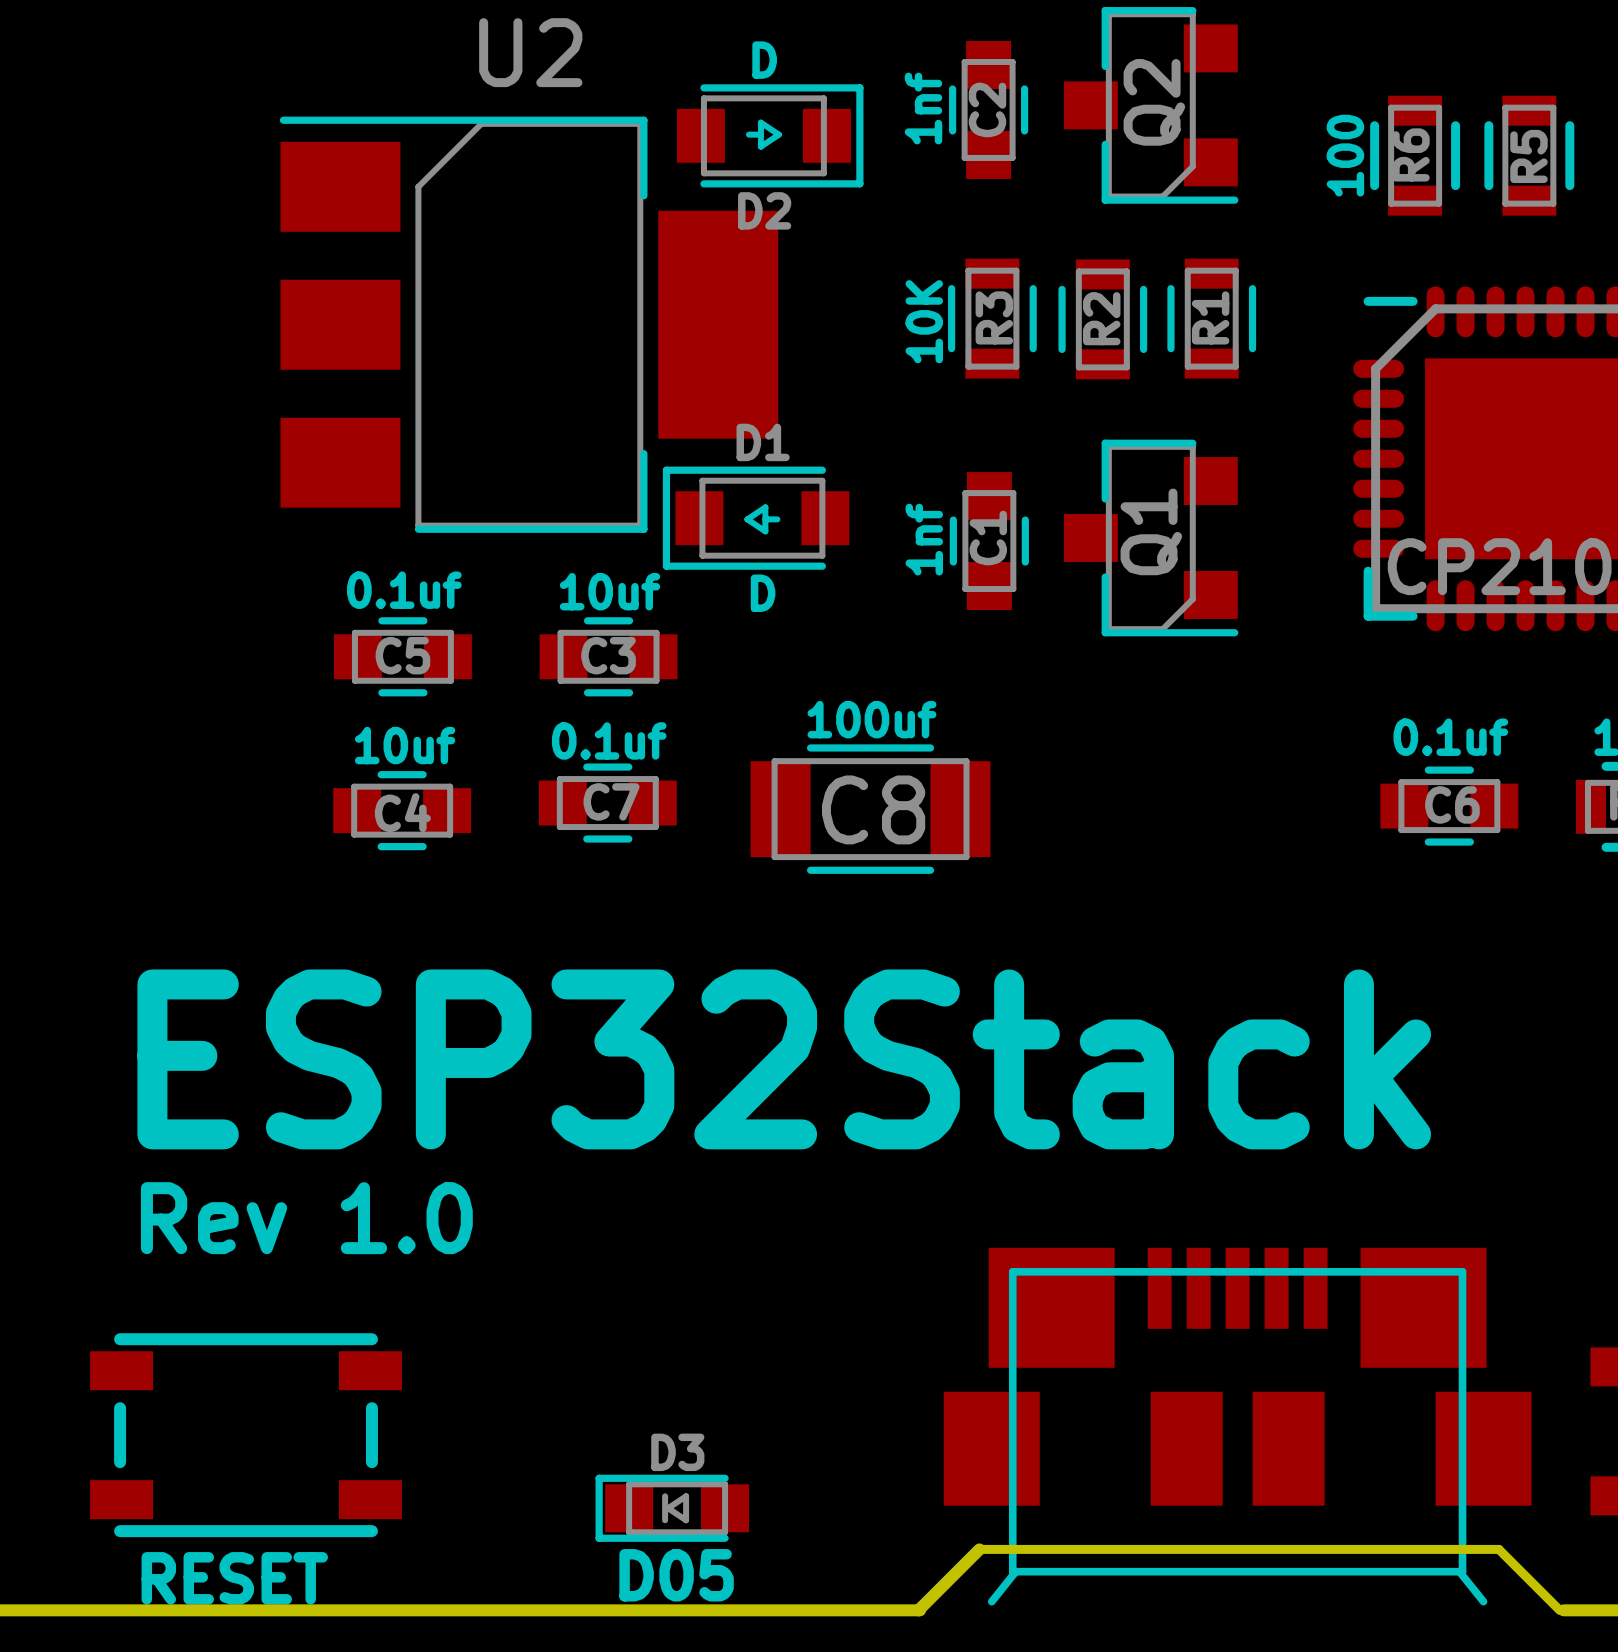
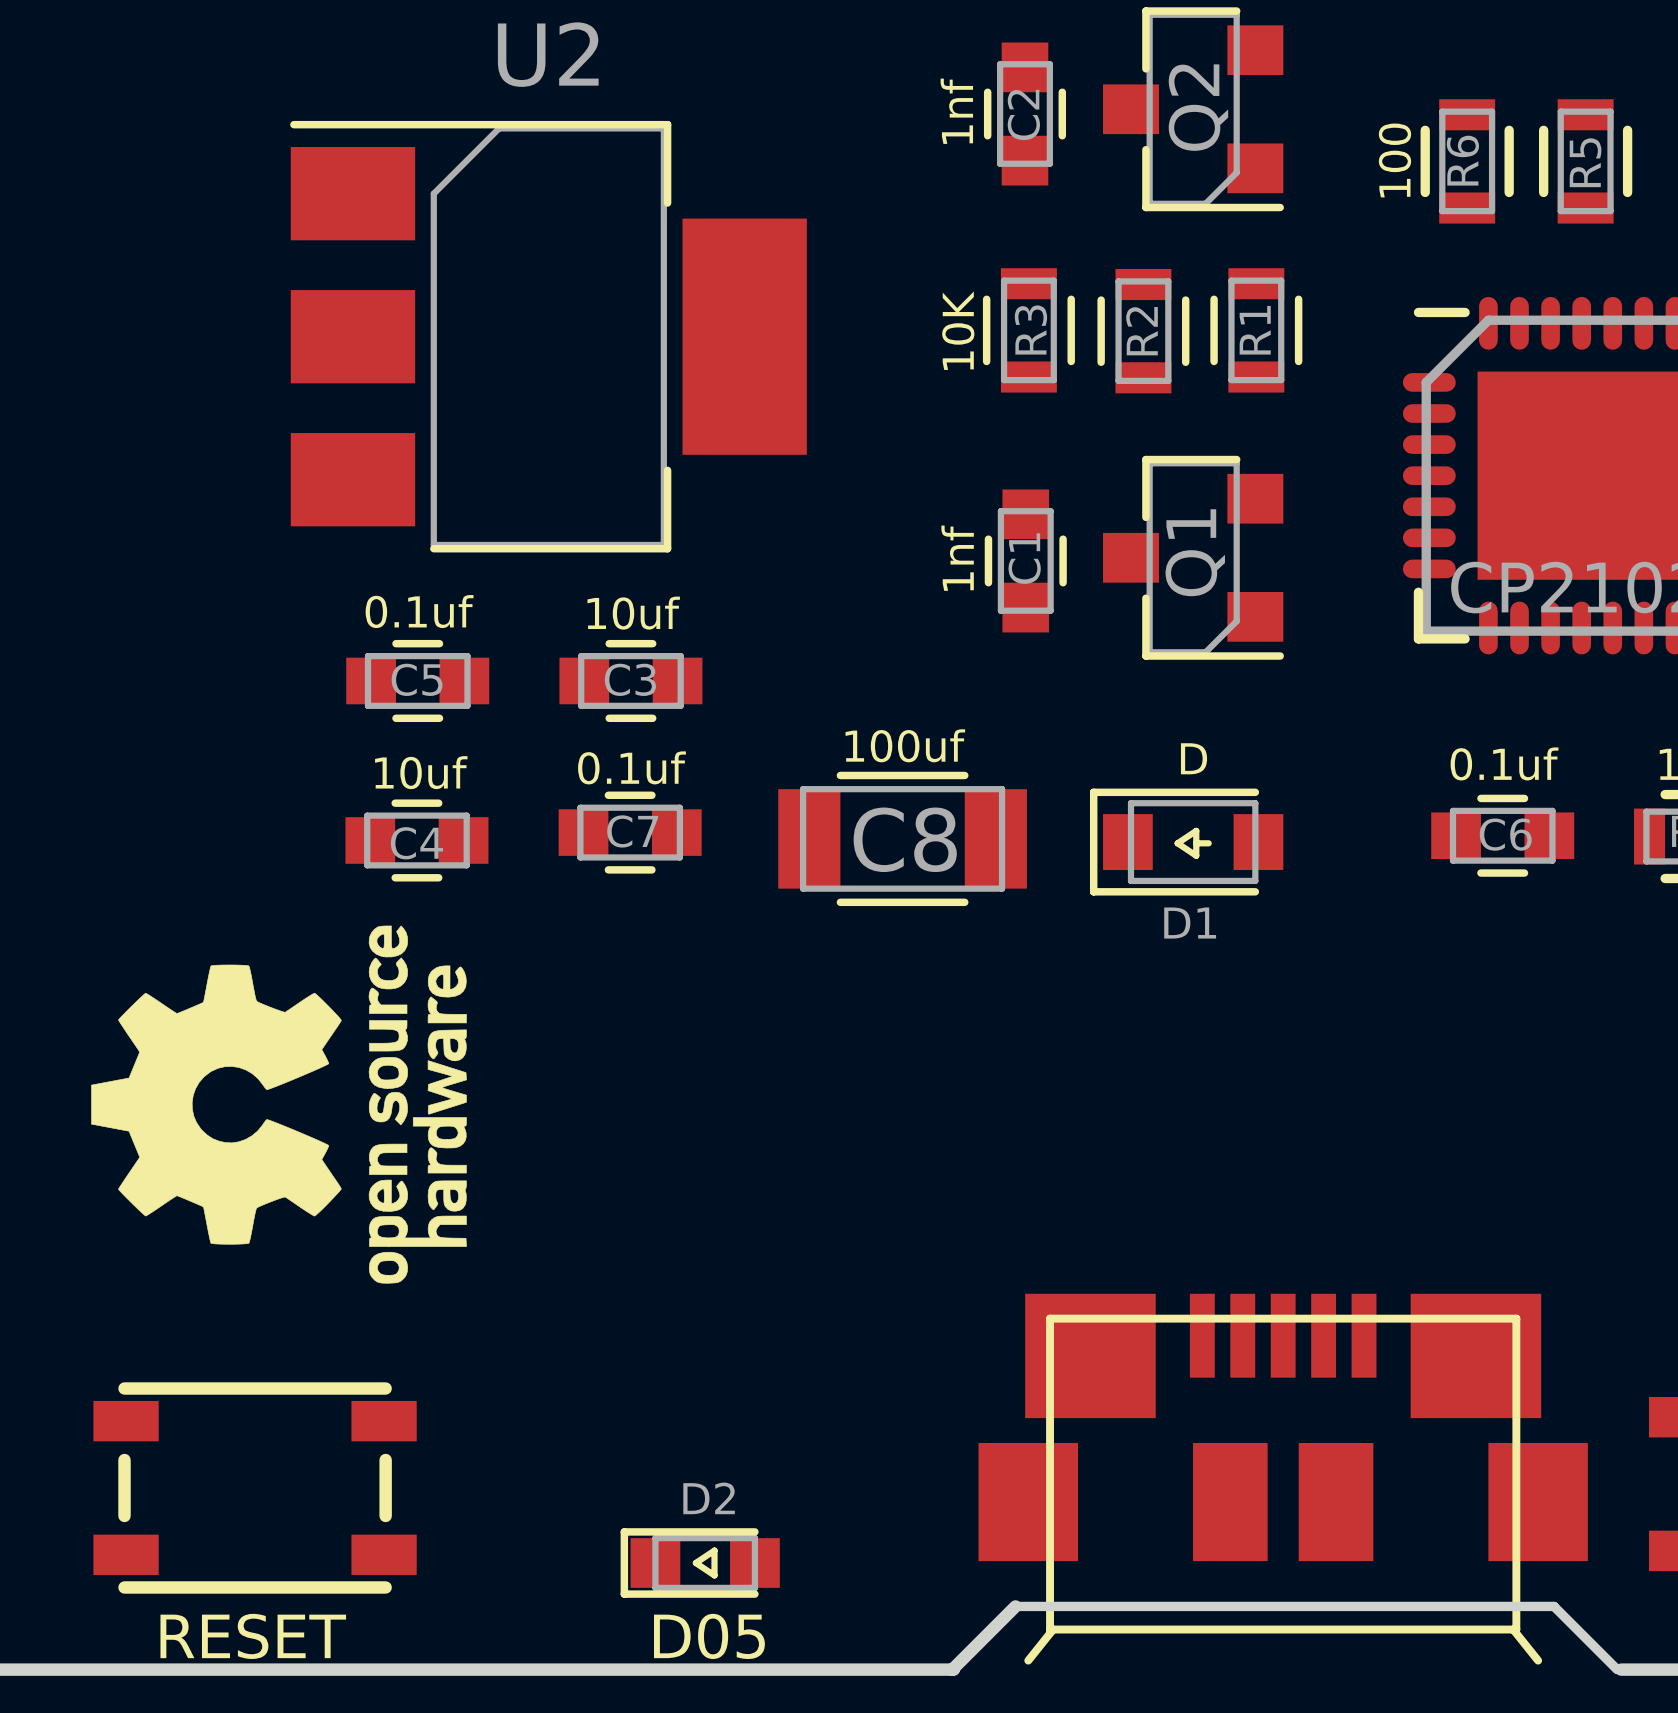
D2 value: D (764, 60) -> D05 (709, 1636)
D2 footprint: [676, 84, 864, 188] -> [620, 1528, 780, 1598]
D2 name position: D2 (764, 210) -> D2 (709, 1498)
D1 name position: D1 (763, 442) -> D1 (1190, 923)
D1 position: (756, 518) -> (1186, 842)
D1 value position: D (763, 593) -> D (1194, 758)
drawing: none -> [91, 925, 467, 1284]
text: ESP32Stack (784, 1059) -> none
text: Rev 1.0 (306, 1218) -> none
D3: D05 (672, 1508) -> none

